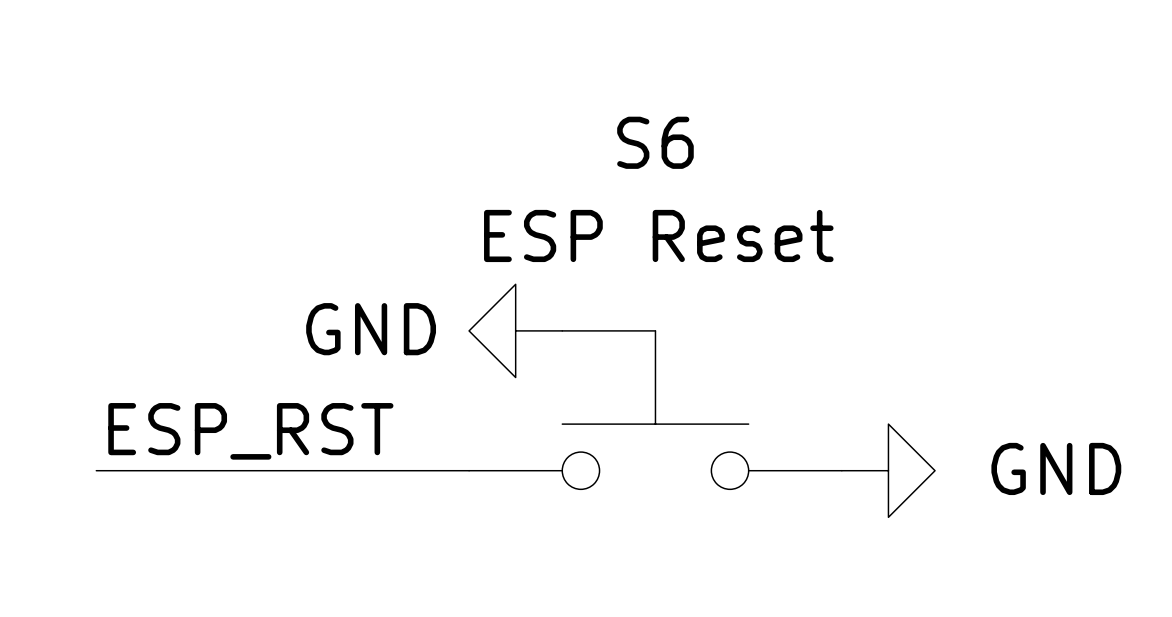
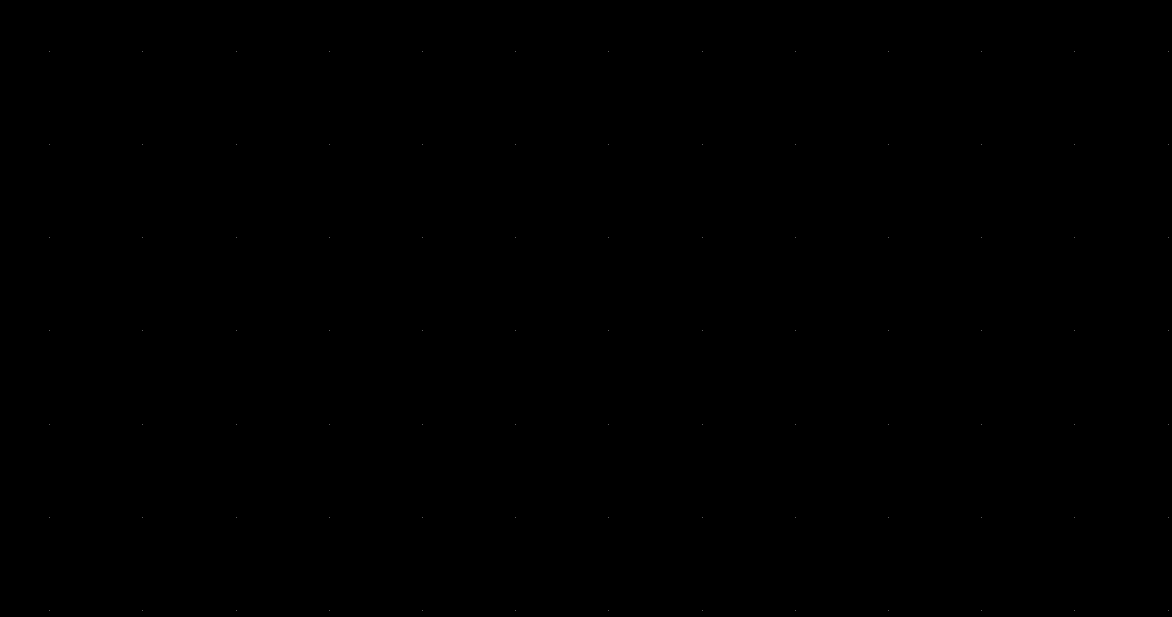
power symbol: GND (515, 330) -> none
S6: ESP Reset (655, 410) -> none
label: ESP_RST (250, 431) -> none
wire: (96, 470) (469, 470) -> none
power symbol: GND (888, 470) -> none

